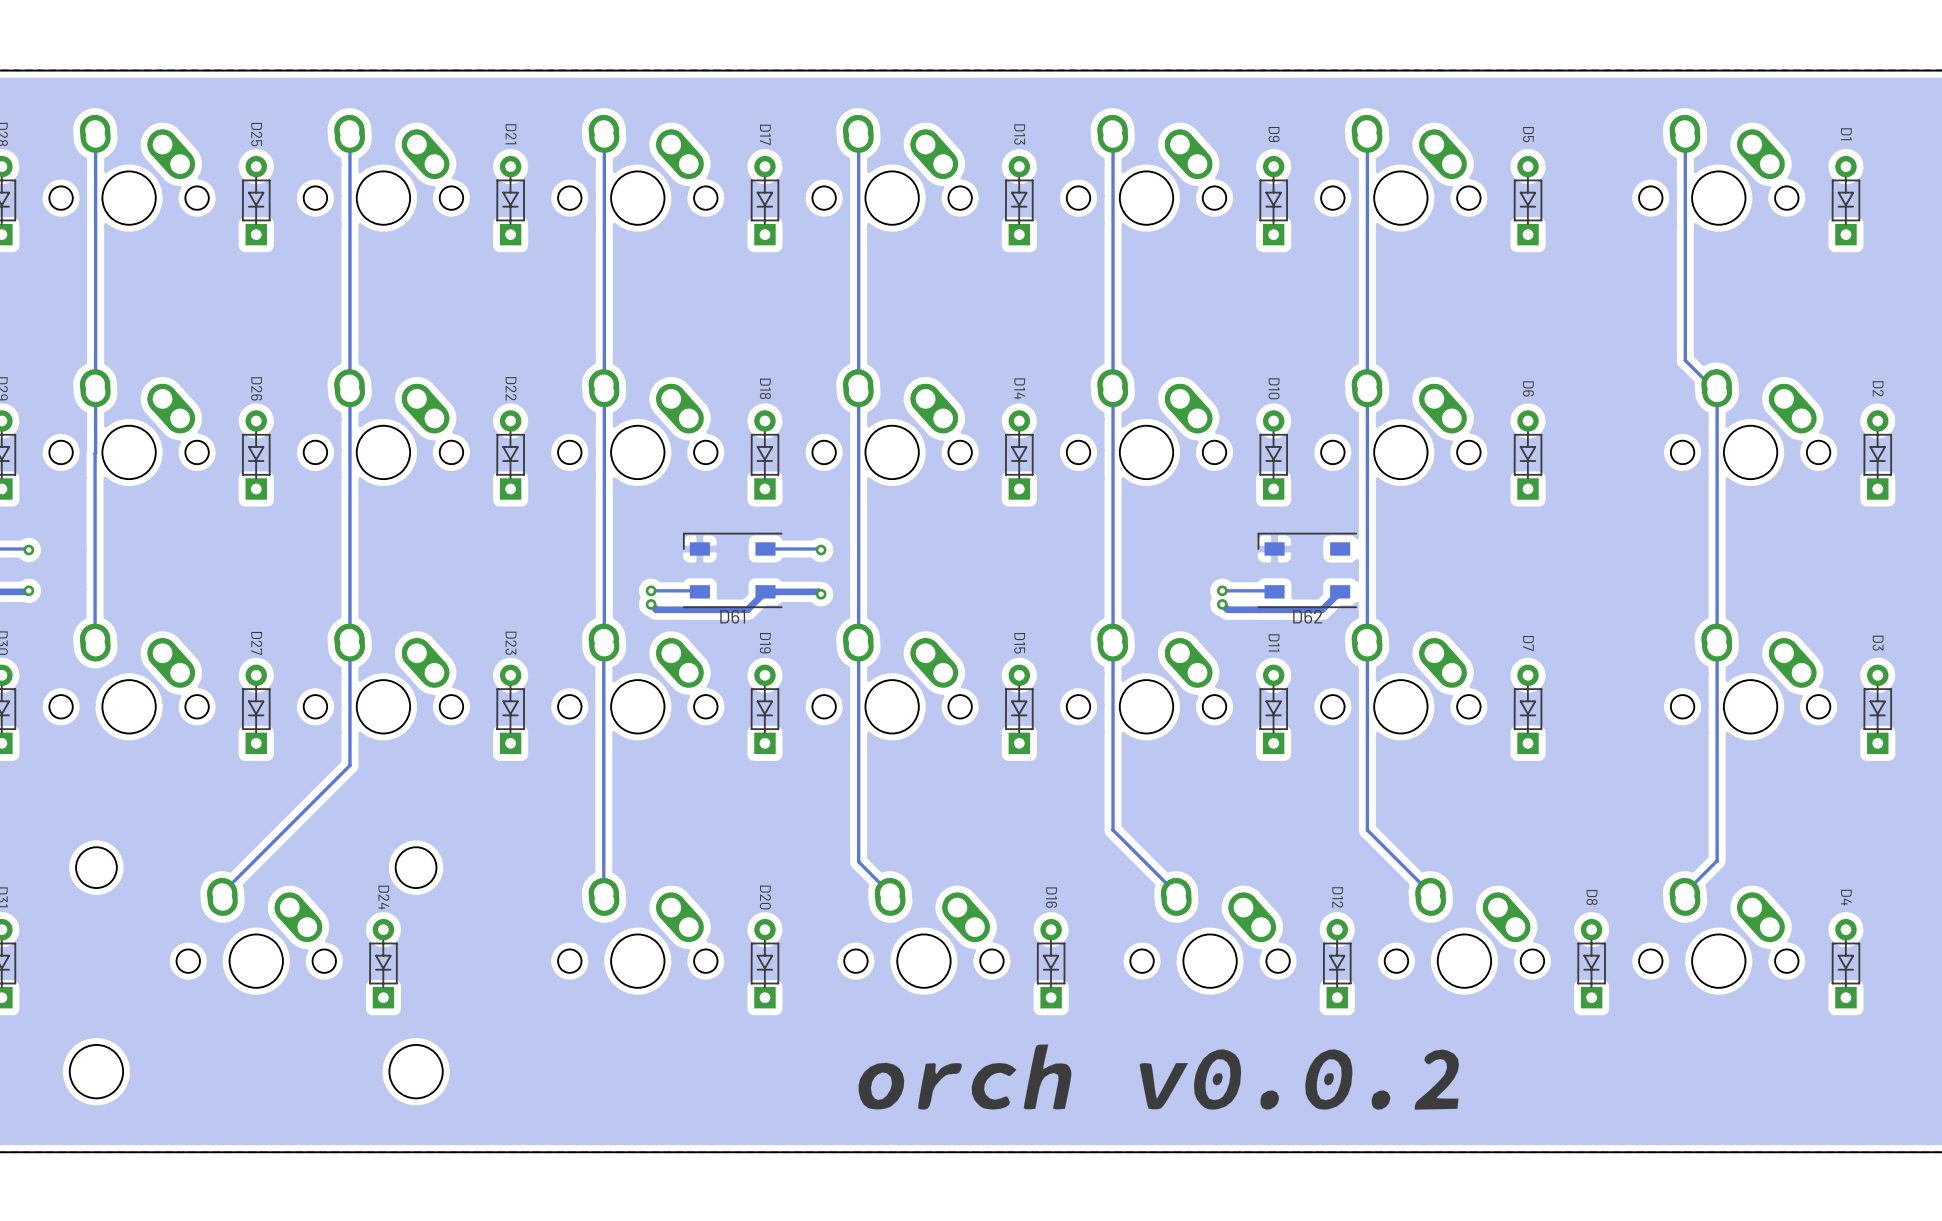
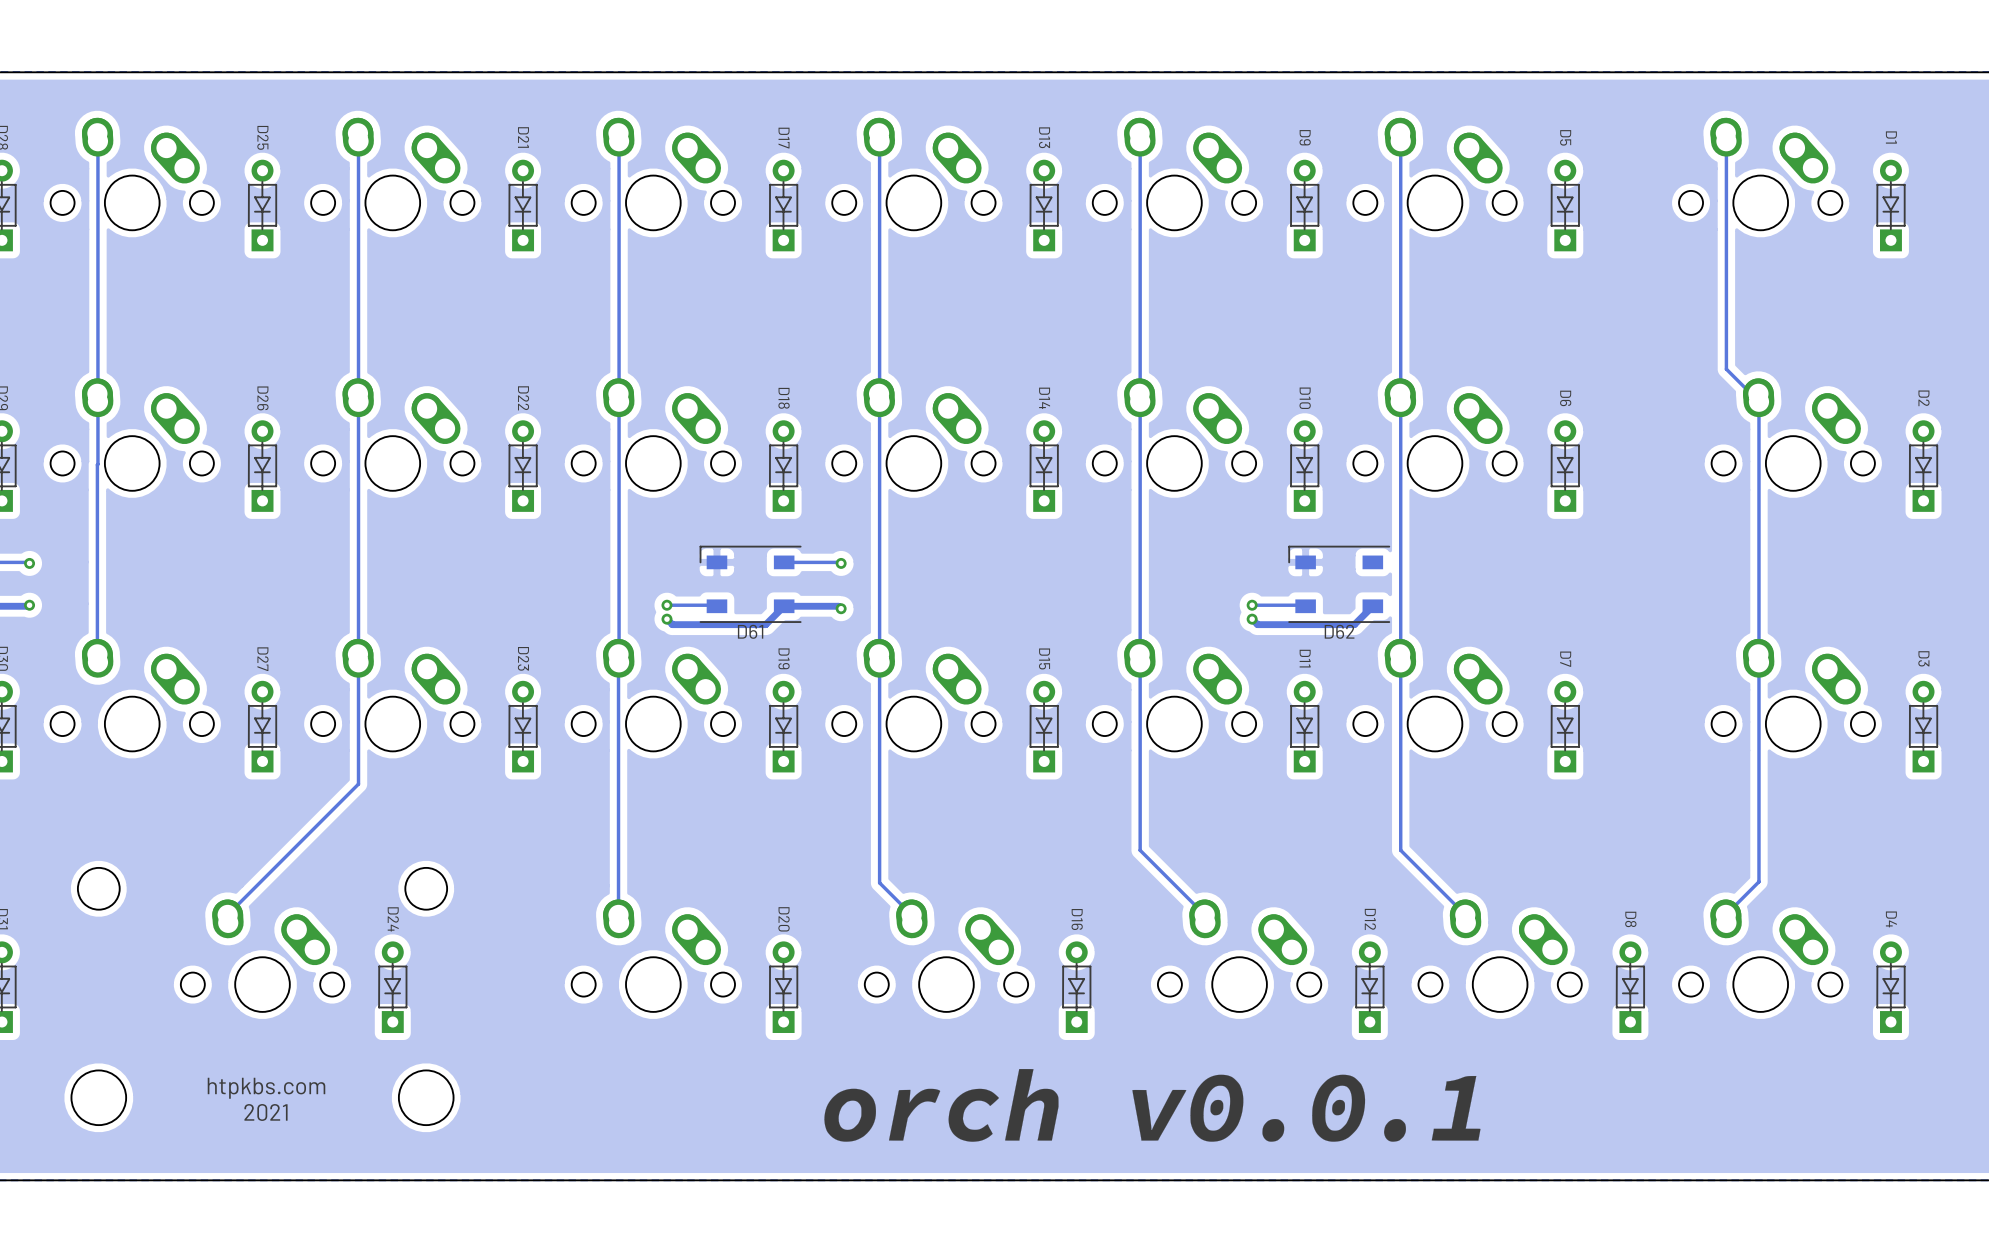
drawing: none -> [824, 1069, 1481, 1142]
drawing: [858, 1044, 1460, 1110] -> none
text: none -> htpkbs.com (266, 1088)
text: none -> 2021 (265, 1112)

